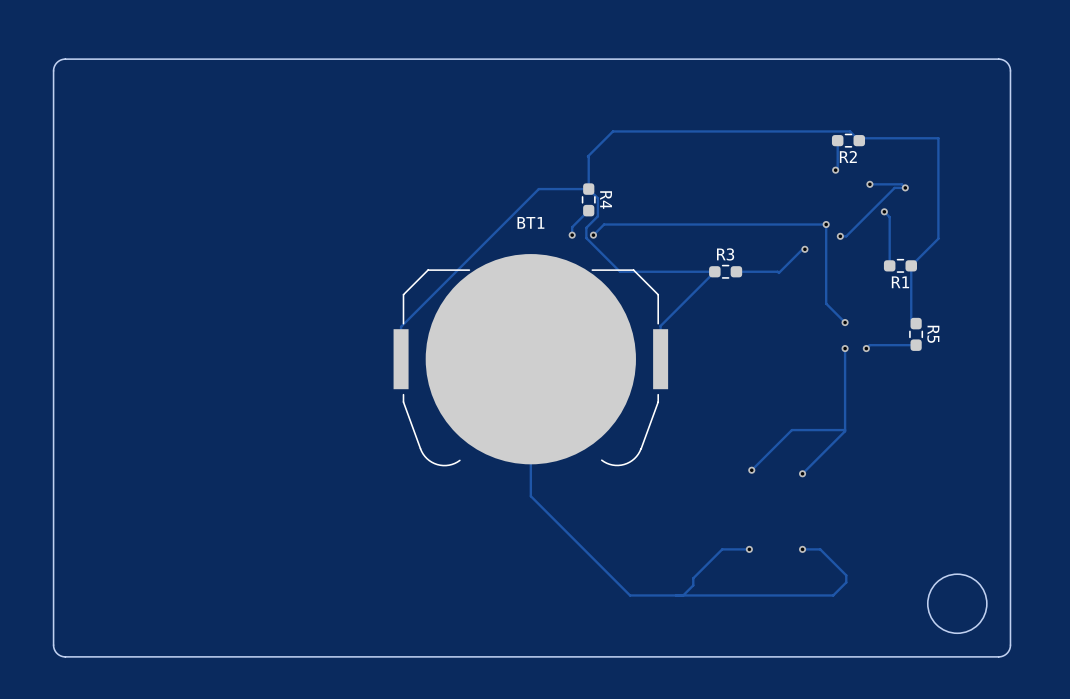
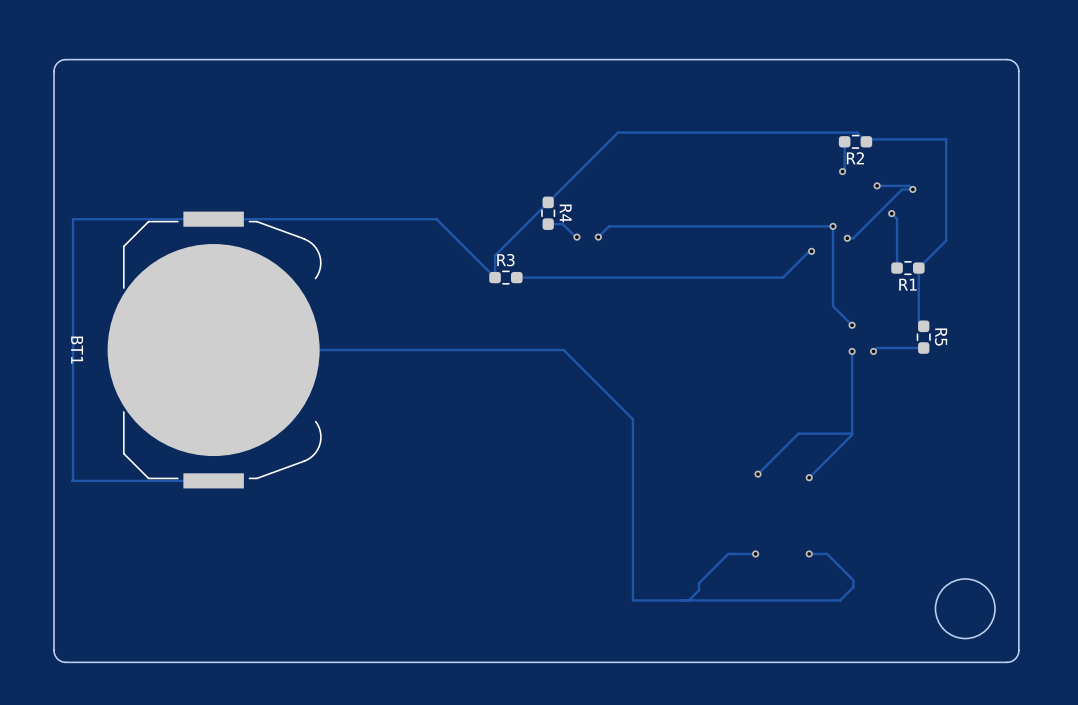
track: (587, 156) (588, 189) -> (592, 157) (495, 255) (495, 277) (436, 219) (73, 219)
track: (588, 189) (538, 189) (401, 326) (401, 359) -> none
track: (588, 189) (597, 198) (597, 216) (586, 227) (586, 238) (620, 271) (714, 271) (660, 325) (660, 359) -> none
R4 position: (588, 199) -> (548, 213)
track: (588, 210) (572, 227) (572, 235) -> none
track: none -> (73, 219) (72, 480) (213, 480)
track: none -> (548, 224) (562, 224) (576, 238)
R3 position: (725, 271) -> (505, 277)
track: (736, 271) (778, 272) -> (516, 277) (783, 277) (785, 275)
track: (530, 359) (530, 496) (630, 595) -> (213, 350) (563, 350) (632, 419) (632, 600) (635, 600)
BT1 rotation: 0° (530, 360) -> 90° counterclockwise (214, 350)
BT1 position: (530, 360) -> (214, 350)

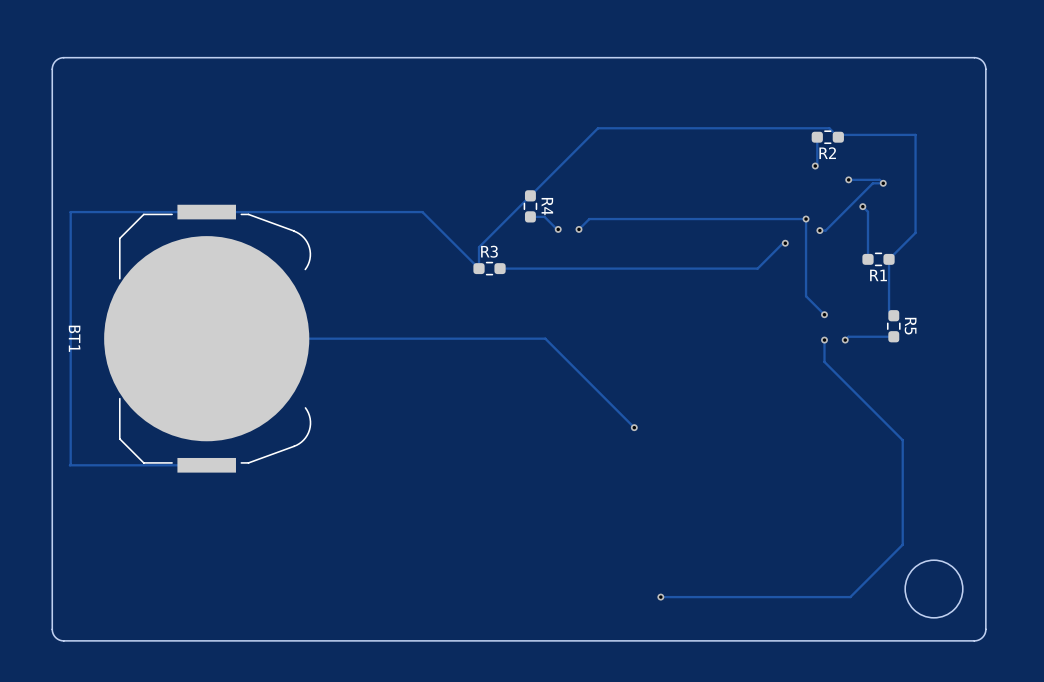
track: (852, 374) (852, 434) (809, 477) -> (824, 361) (902, 440) (902, 544) (850, 597) (660, 597)
track: (632, 419) (632, 600) (840, 600) (853, 587) (853, 580) (827, 553) (809, 553) -> (612, 405) (634, 427)
track: (852, 433) (798, 433) (758, 474) -> none
via: none -> (634, 427)
via: (758, 474) -> none
via: (809, 477) -> none
track: (755, 553) (728, 553) (699, 583) (699, 590) (688, 600) -> none
via: (755, 553) -> none
via: (809, 553) -> none
via: none -> (660, 597)

